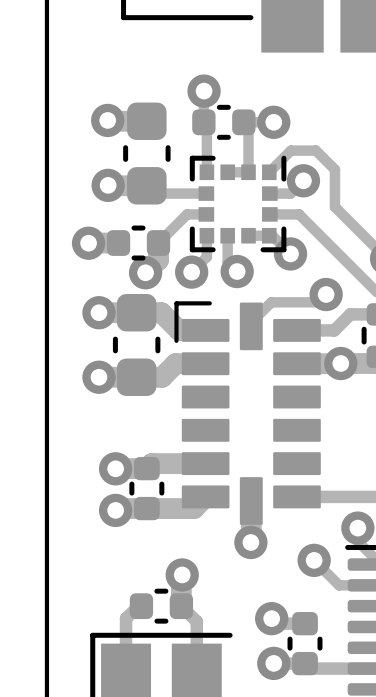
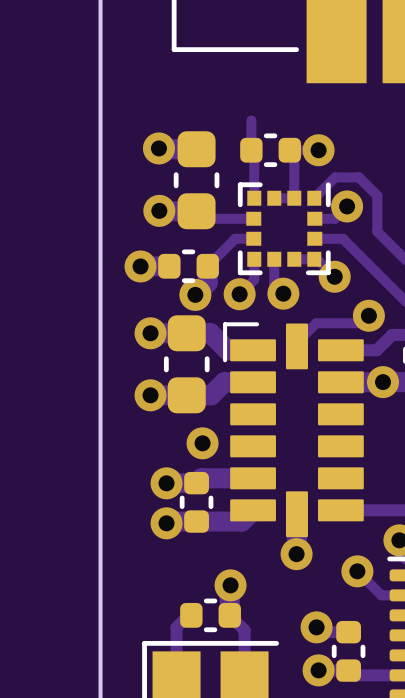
via: (204, 91) -> none
via: none -> (202, 443)

